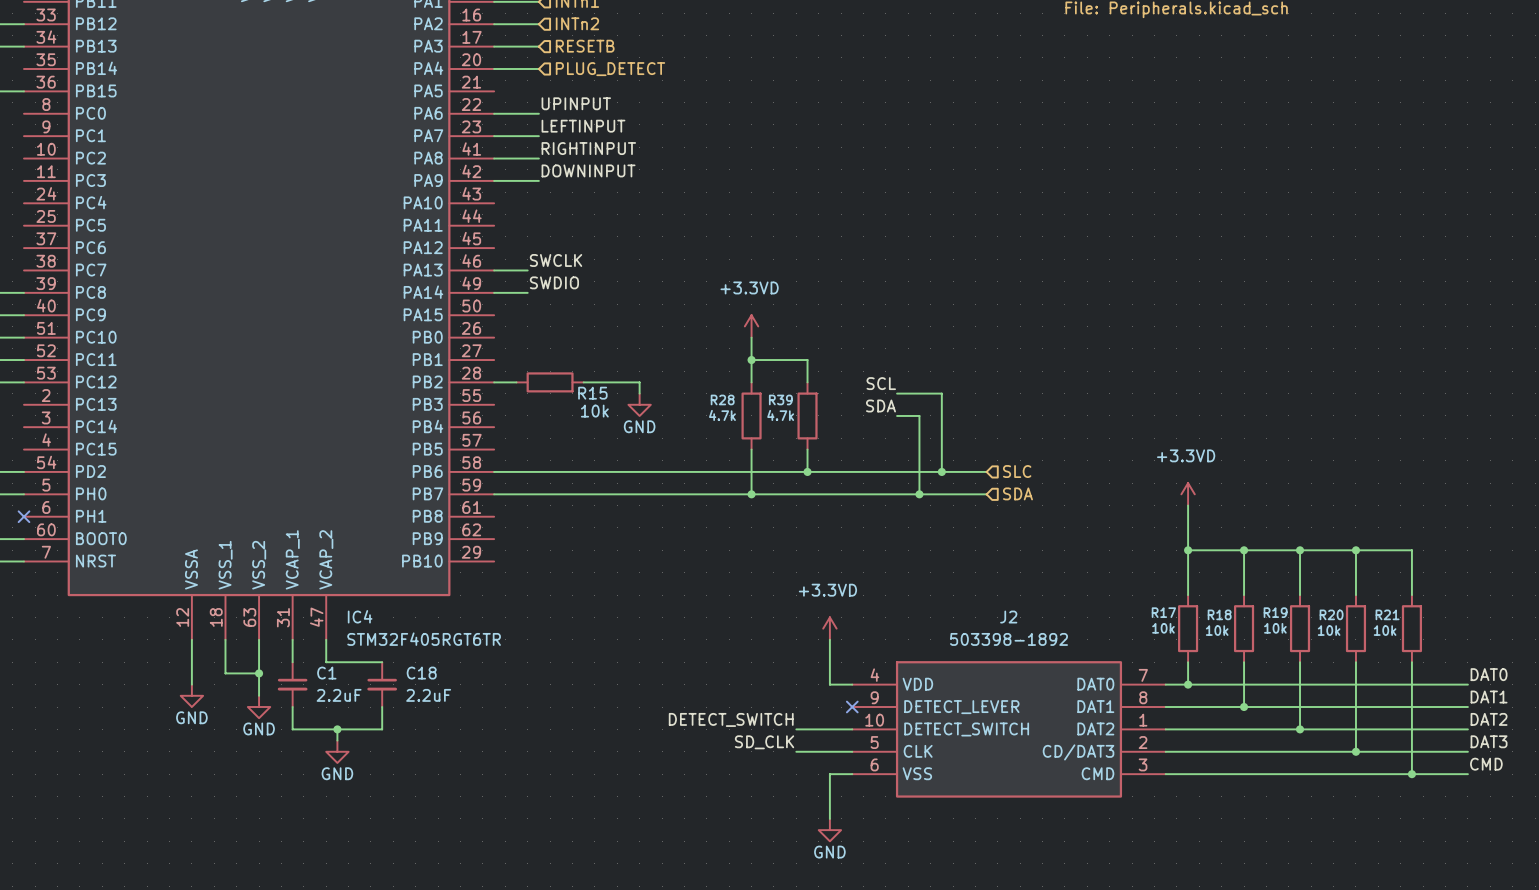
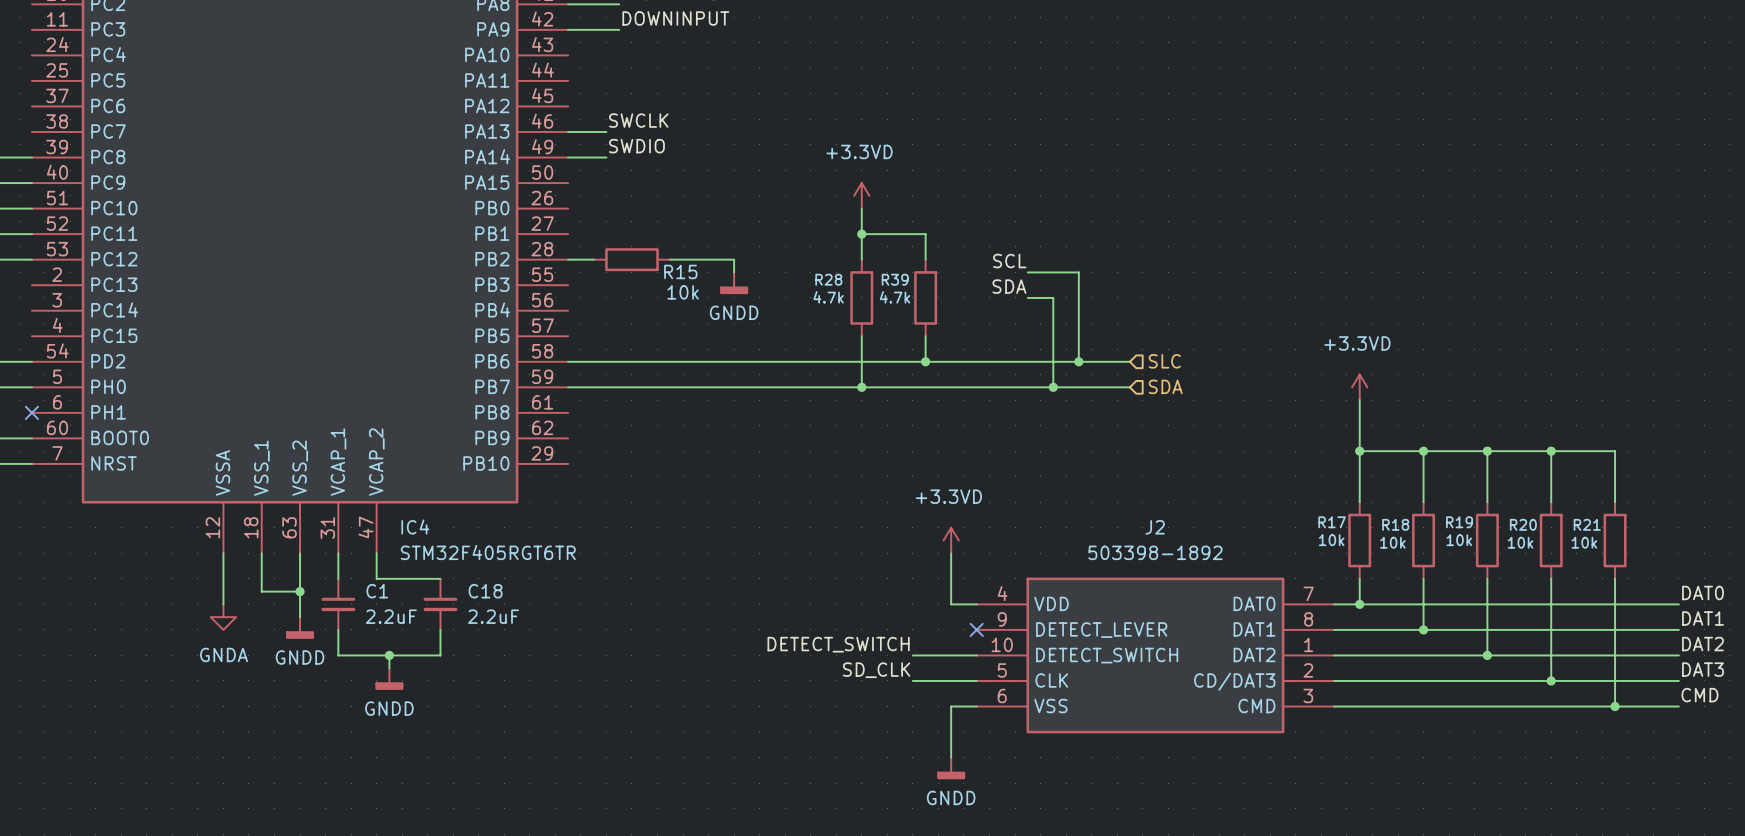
power symbol: GND (639, 404) -> GNDD (734, 283)
power symbol: GND (191, 695) -> GNDA (223, 617)
power symbol: GND (259, 707) -> GNDD (300, 628)
power symbol: GND (337, 751) -> GNDD (389, 679)
power symbol: GND (829, 830) -> GNDD (951, 768)

